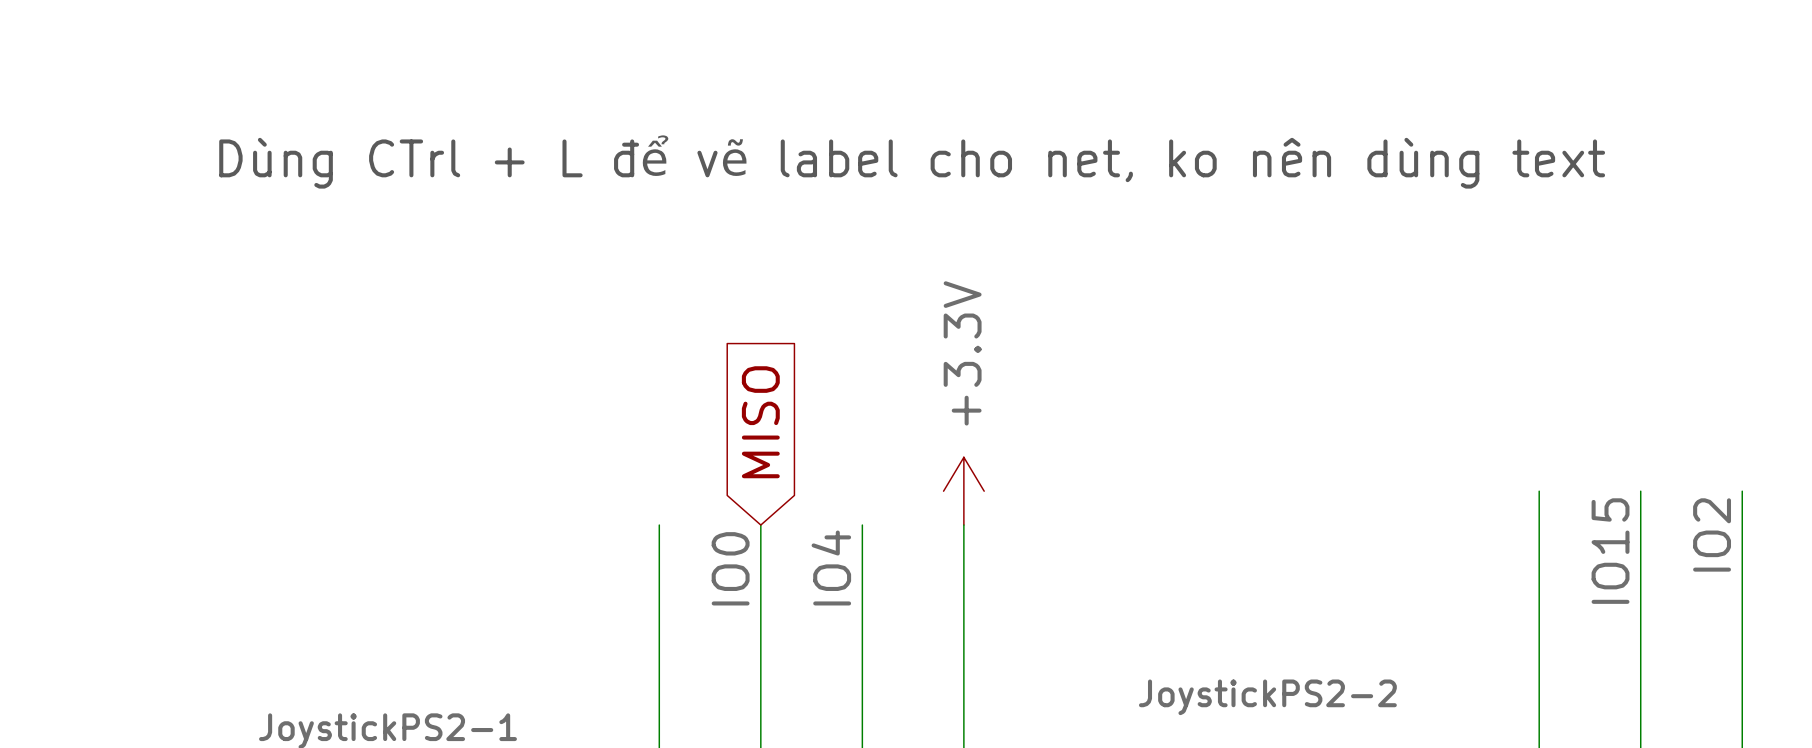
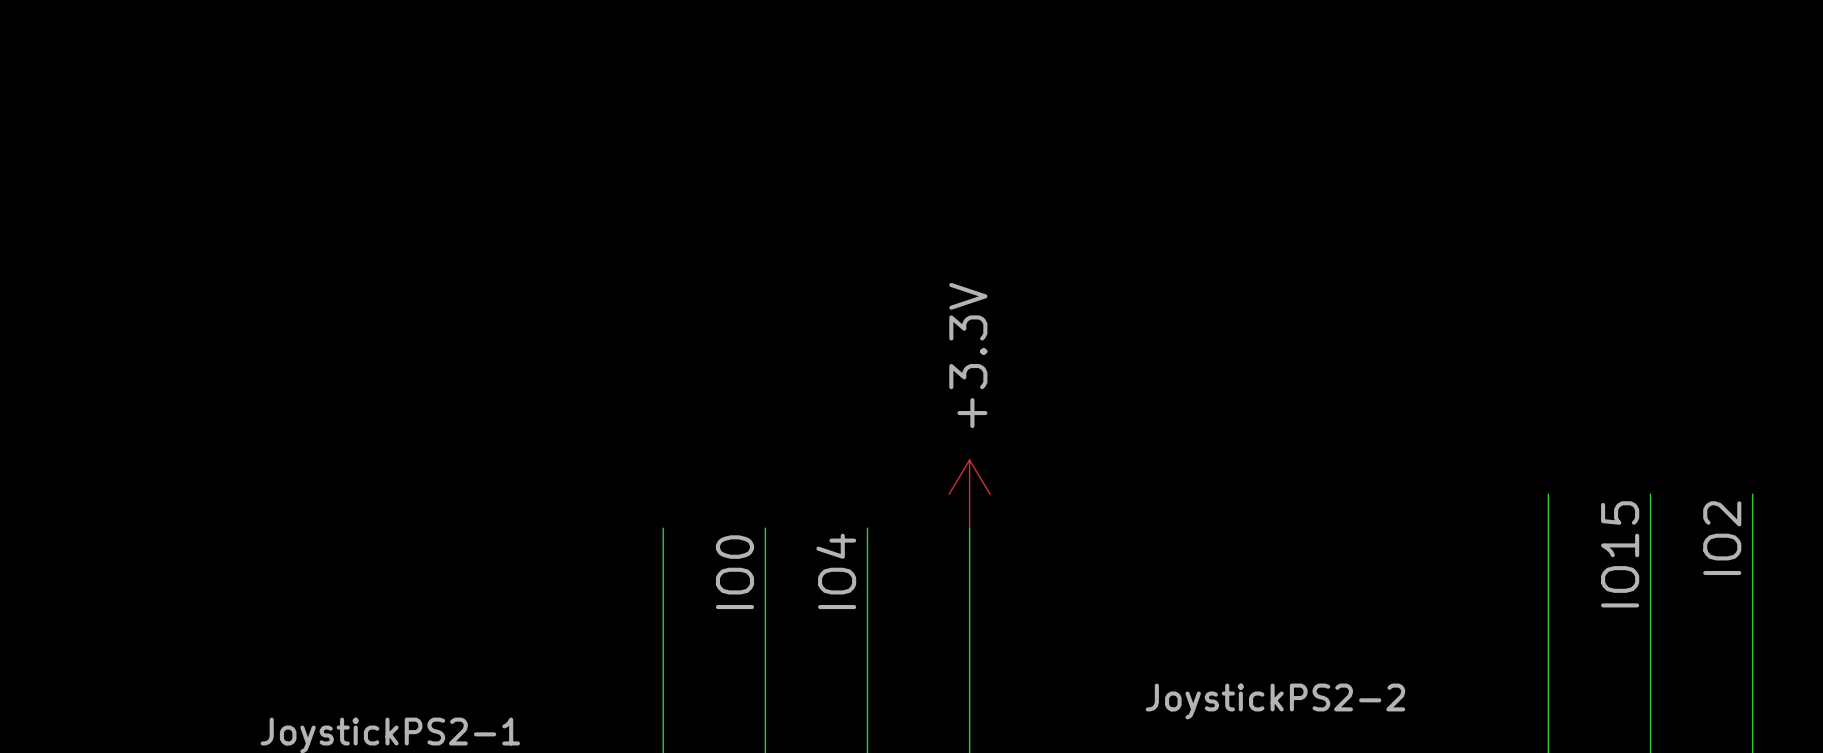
text: Dùng CTrl + L để vẽ label cho net, ko nên dùng text (912, 160) -> none
global label: MISO (760, 422) -> none

